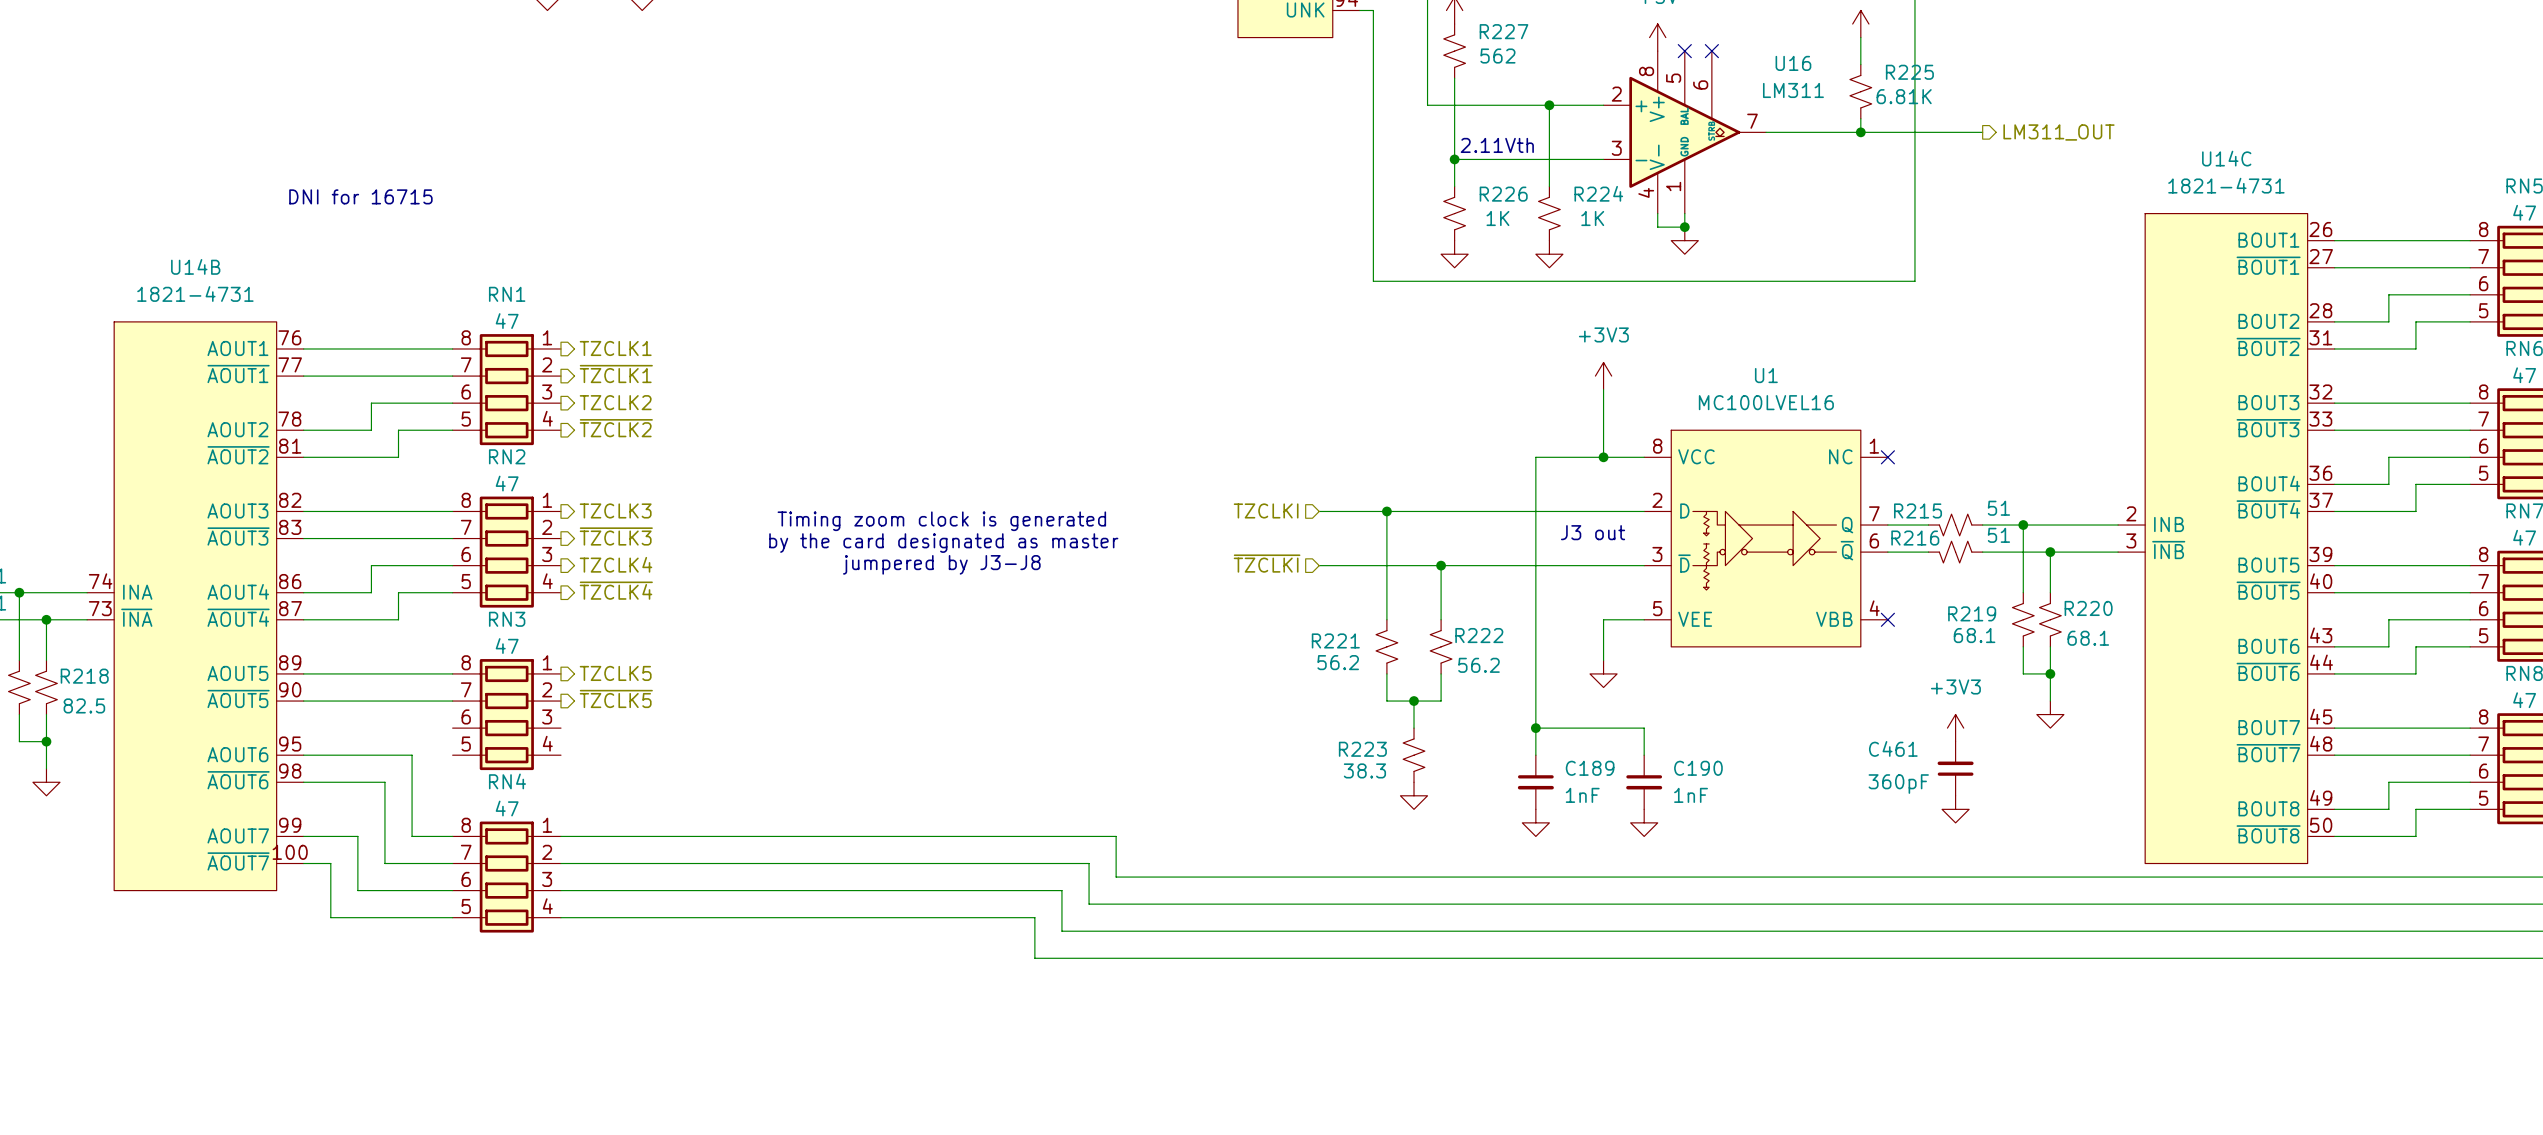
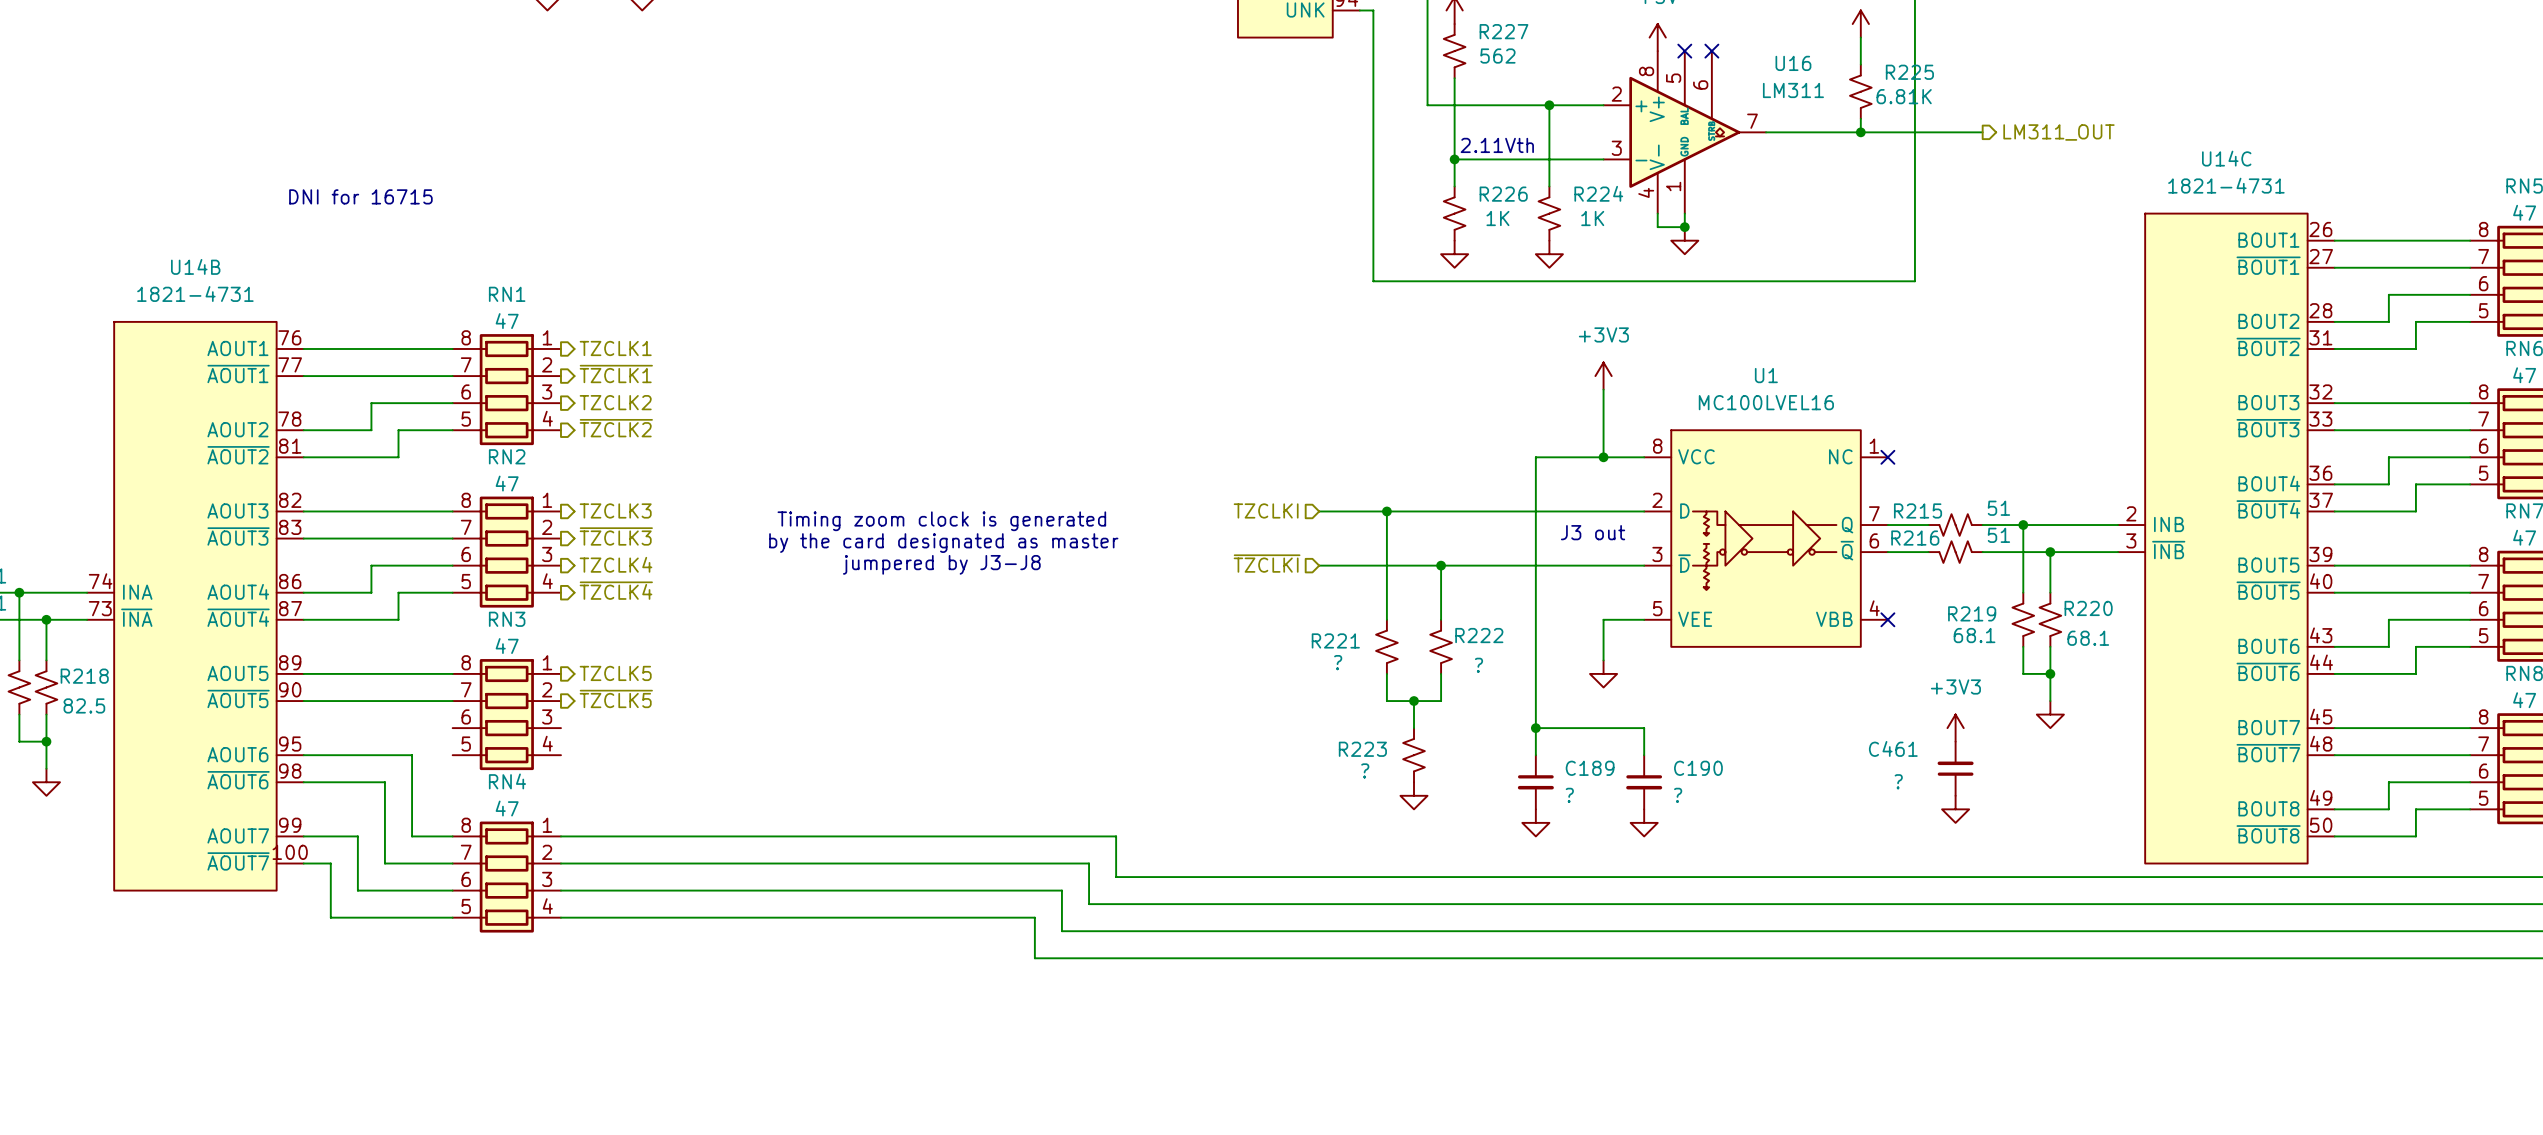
R221 value: 56.2 (1338, 662) -> ? (1338, 662)
R222 value: 56.2 (1478, 665) -> ? (1478, 665)
R223 value: 38.3 (1364, 770) -> ? (1365, 770)
C461 value: 360pF (1898, 784) -> ? (1898, 781)
C189 value: 1nF (1582, 795) -> ? (1569, 795)
C190 value: 1nF (1691, 795) -> ? (1678, 795)

